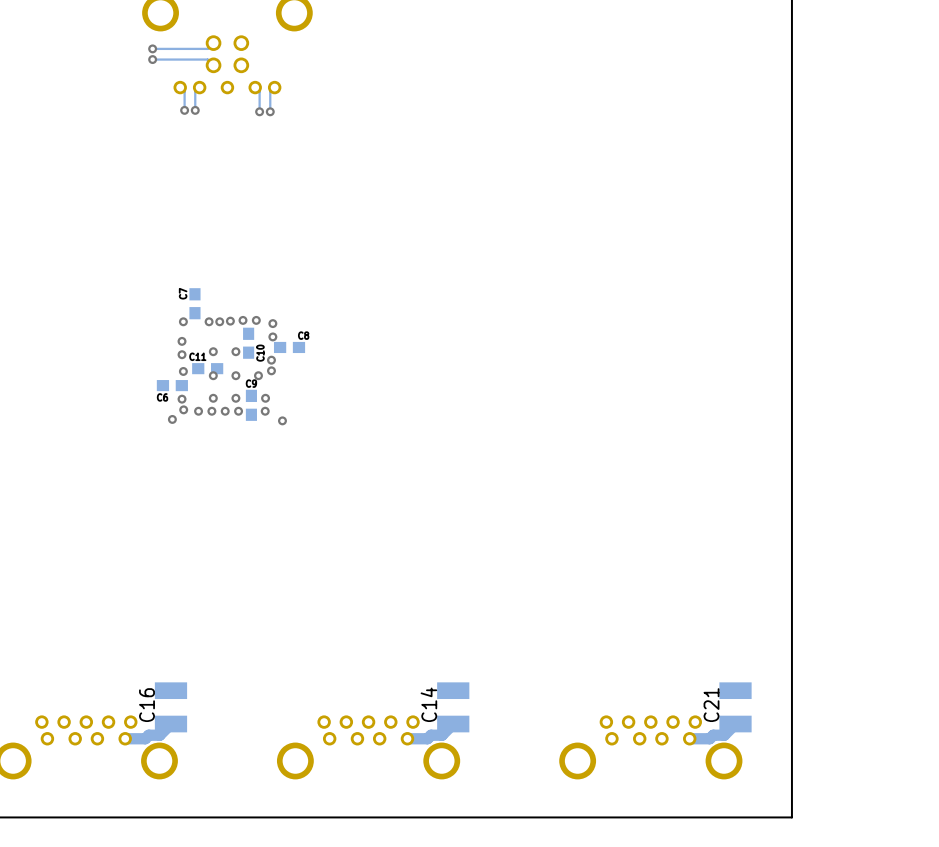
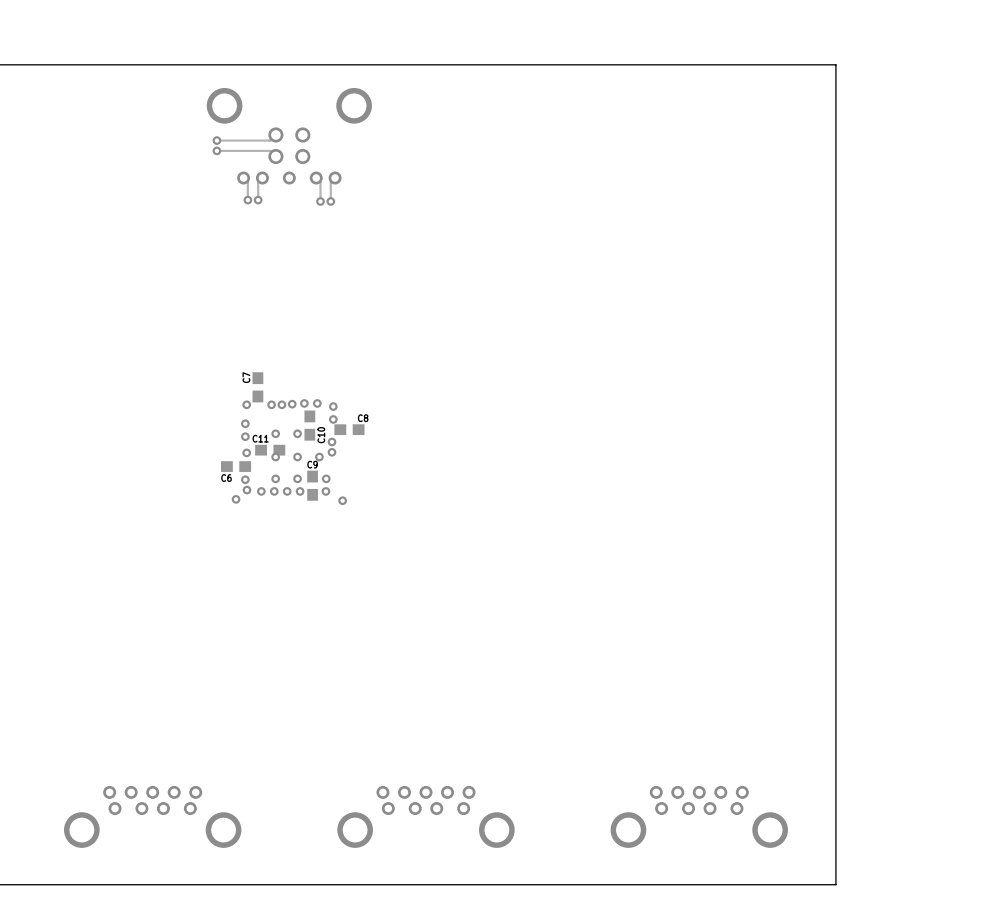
C16: (170, 707) -> none
C14: (453, 707) -> none
C21: (735, 707) -> none
track: (170, 724) (159, 735) (148, 735) (145, 738) (125, 738) -> none
track: (453, 724) (442, 735) (431, 735) (427, 738) (407, 738) -> none
track: (735, 724) (724, 735) (713, 735) (709, 738) (689, 738) -> none

